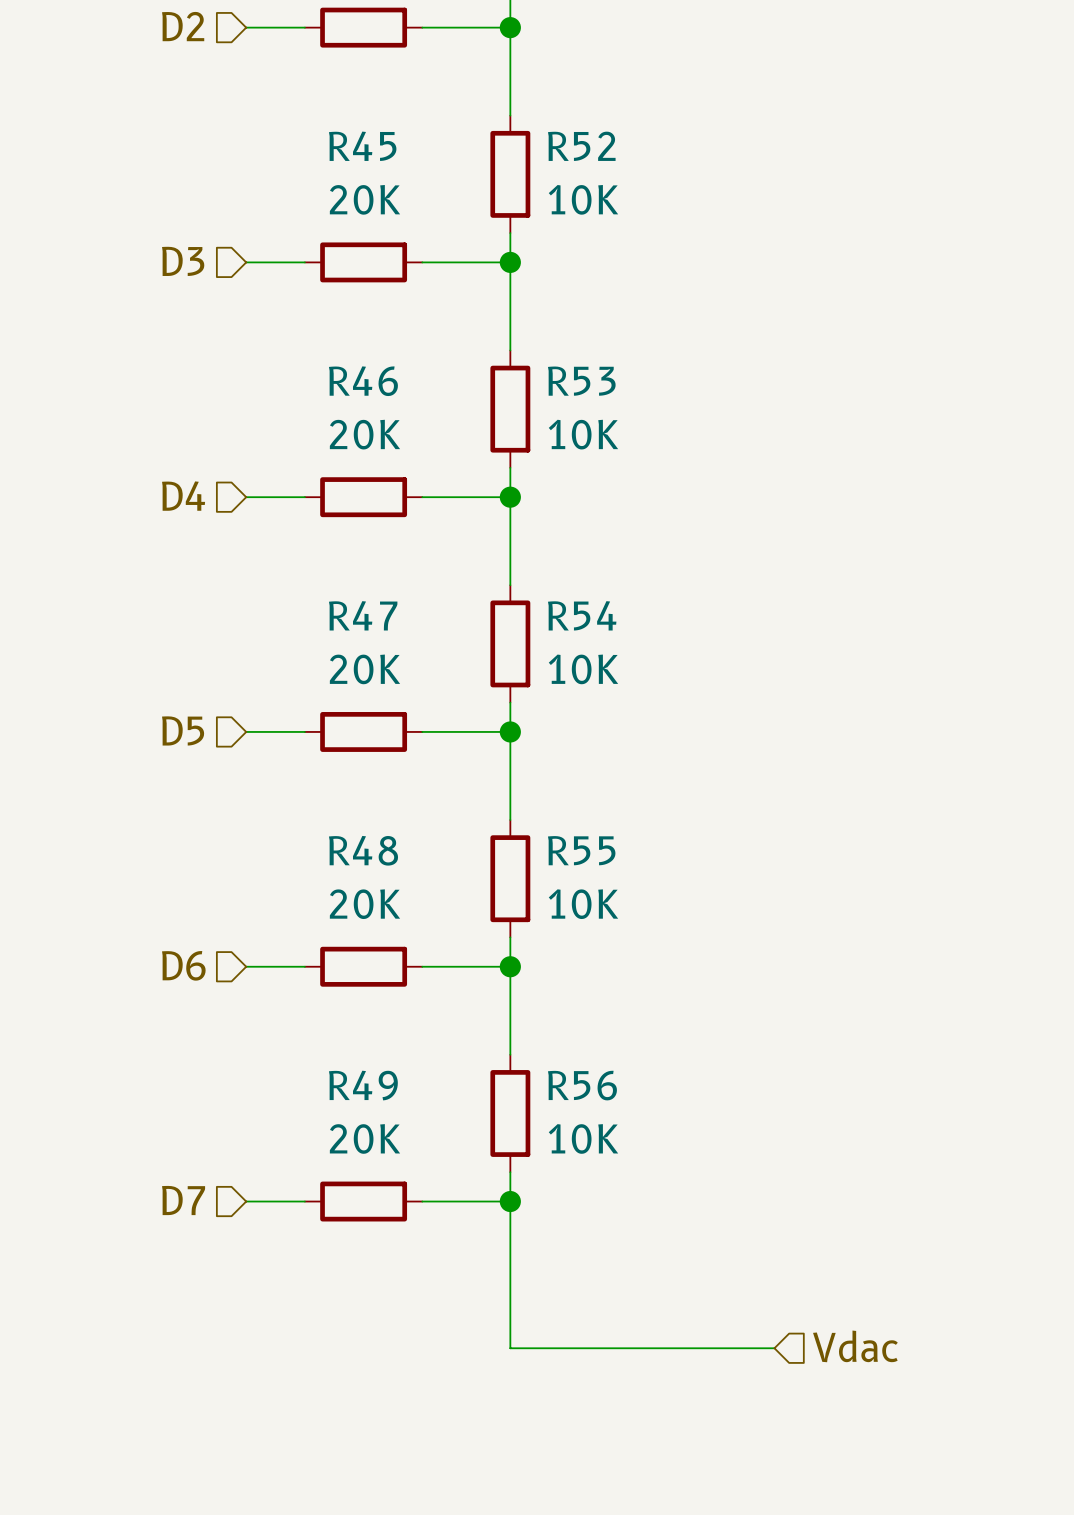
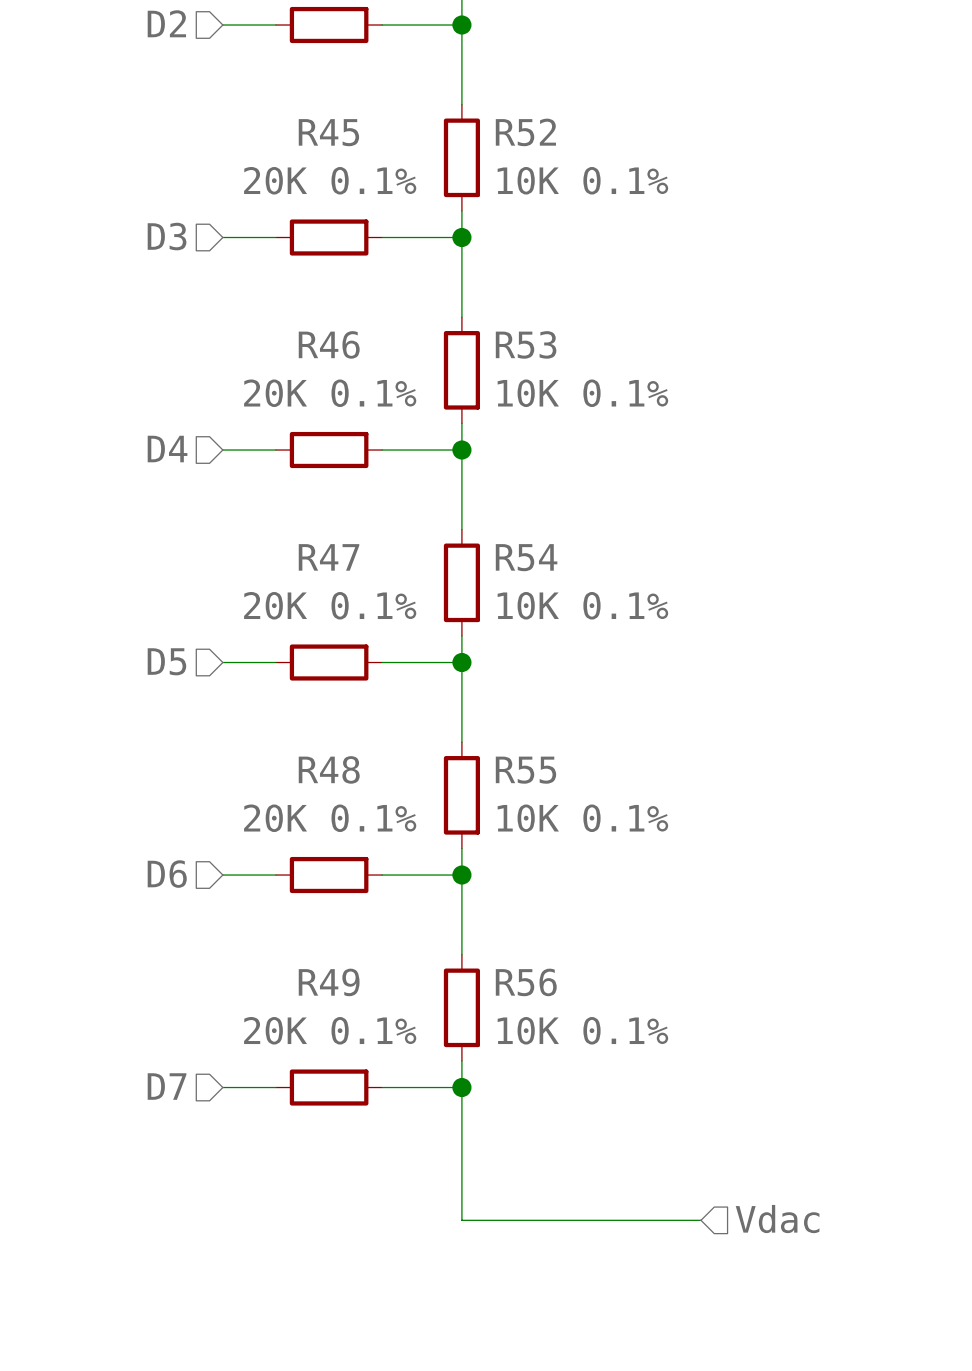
R45 value: 20K (364, 199) -> 20K 0.1% (330, 180)
R52 value: 10K (583, 199) -> 10K 0.1% (582, 180)
R46 value: 20K (364, 434) -> 20K 0.1% (330, 393)
R53 value: 10K (583, 434) -> 10K 0.1% (582, 393)
R47 value: 20K (364, 669) -> 20K 0.1% (330, 605)
R54 value: 10K (583, 669) -> 10K 0.1% (582, 605)
R48 value: 20K (364, 904) -> 20K 0.1% (330, 818)
R55 value: 10K (583, 904) -> 10K 0.1% (582, 818)
R49 value: 20K (364, 1138) -> 20K 0.1% (330, 1030)
R56 value: 10K (583, 1138) -> 10K 0.1% (582, 1030)

